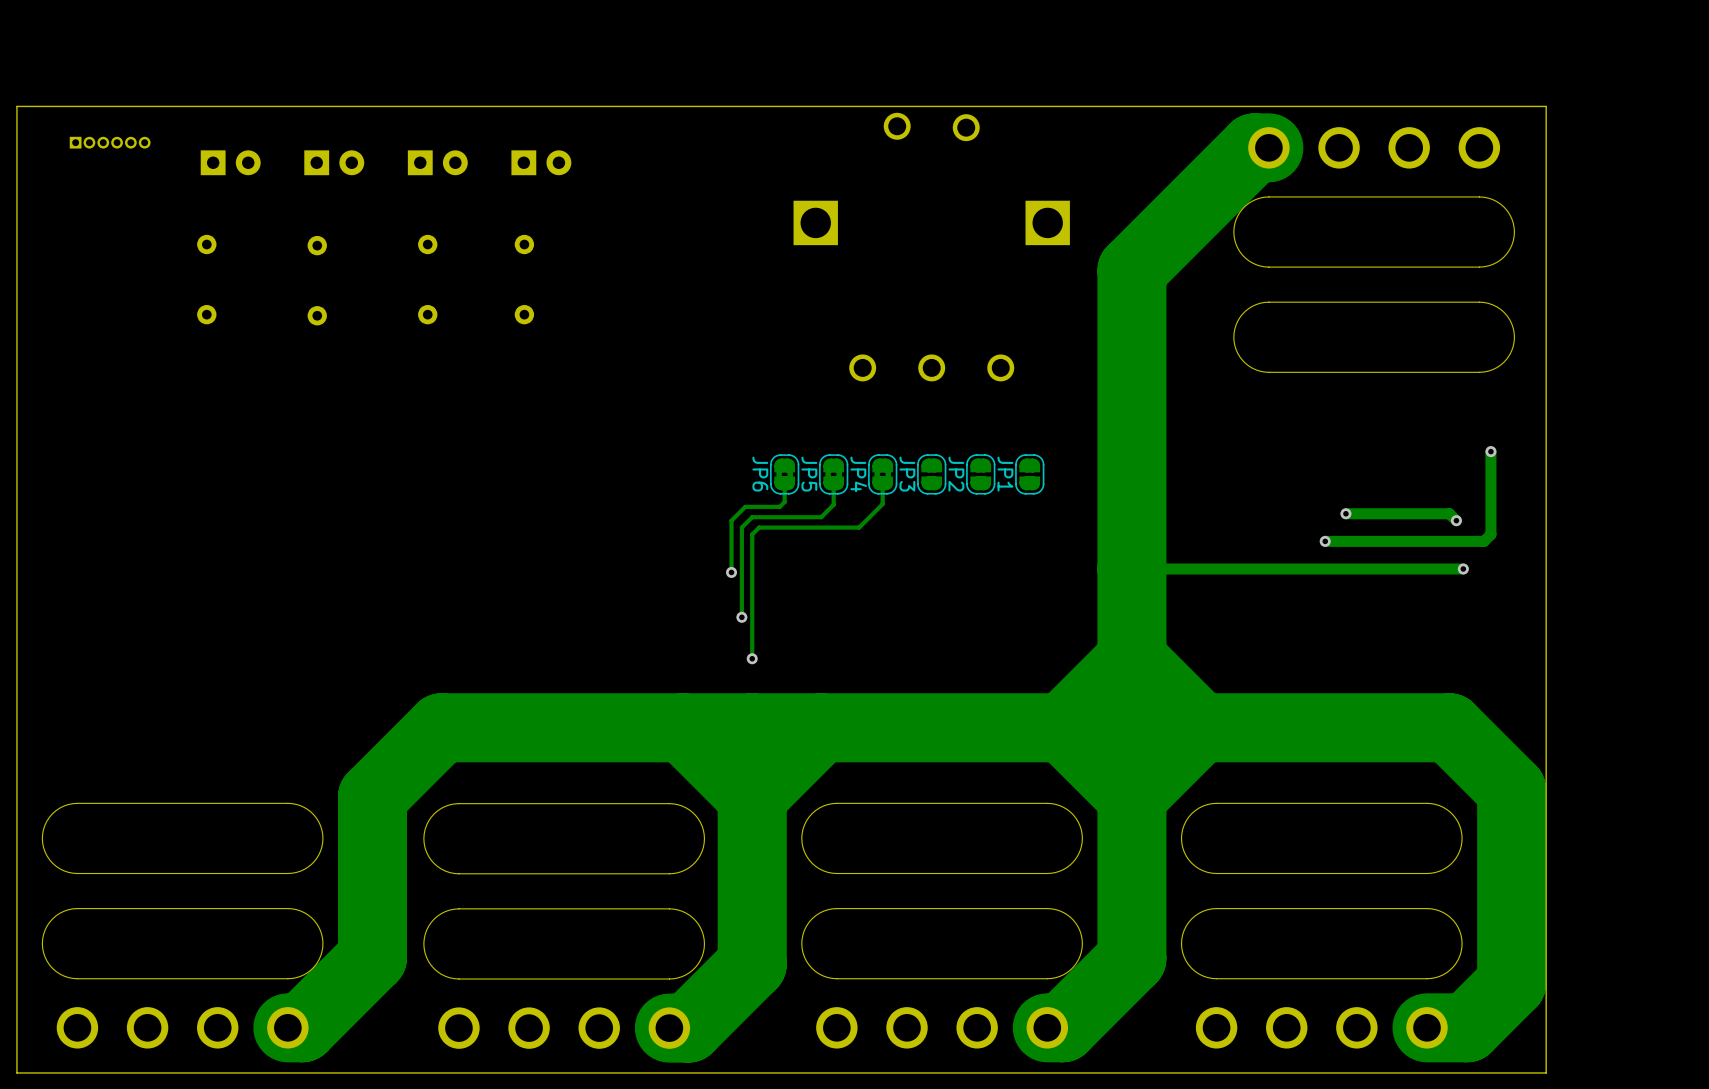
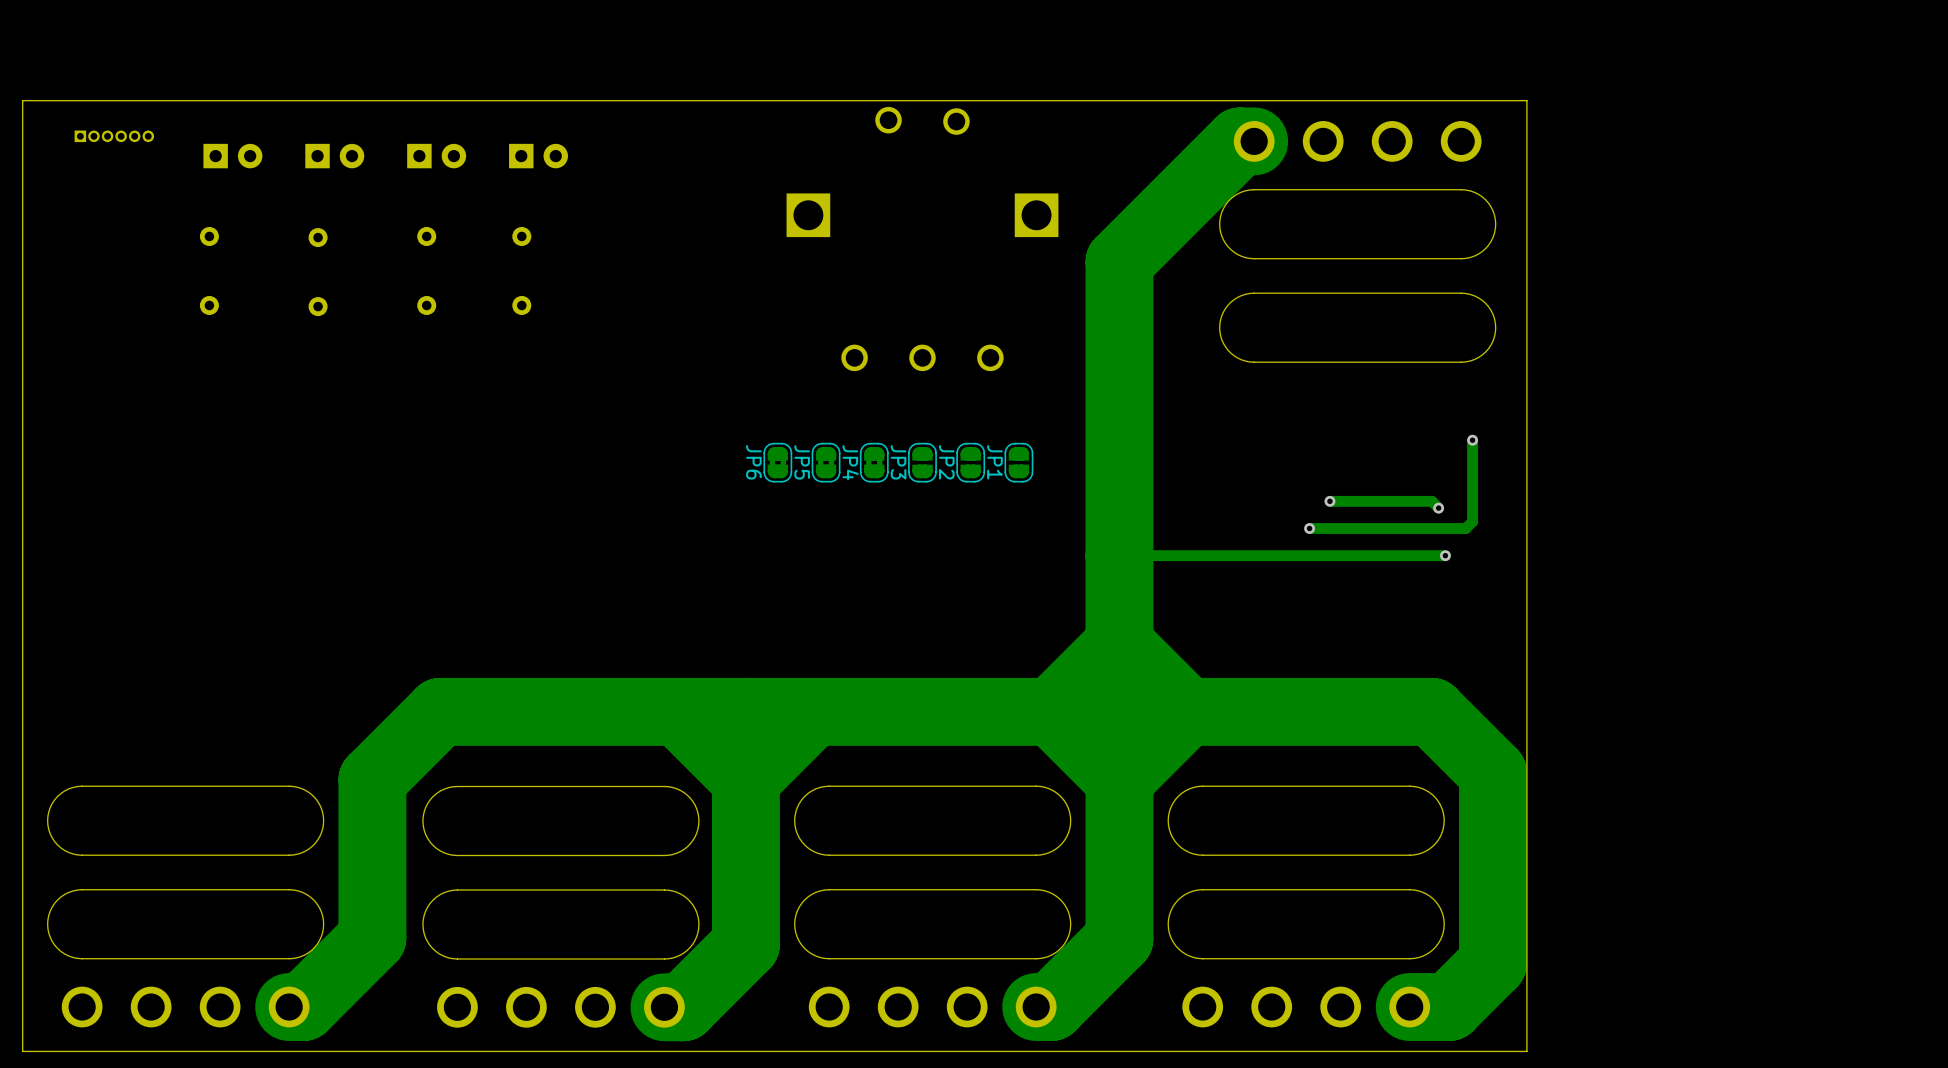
track: (784, 483) (784, 502) (779, 506) (745, 506) (731, 520) (731, 572) -> none
track: (833, 483) (833, 504) (821, 517) (752, 517) (741, 527) (741, 617) -> none
track: (882, 483) (882, 504) (859, 527) (759, 527) (752, 534) (752, 658) -> none
via: (731, 572) -> none
via: (741, 617) -> none
via: (752, 658) -> none

